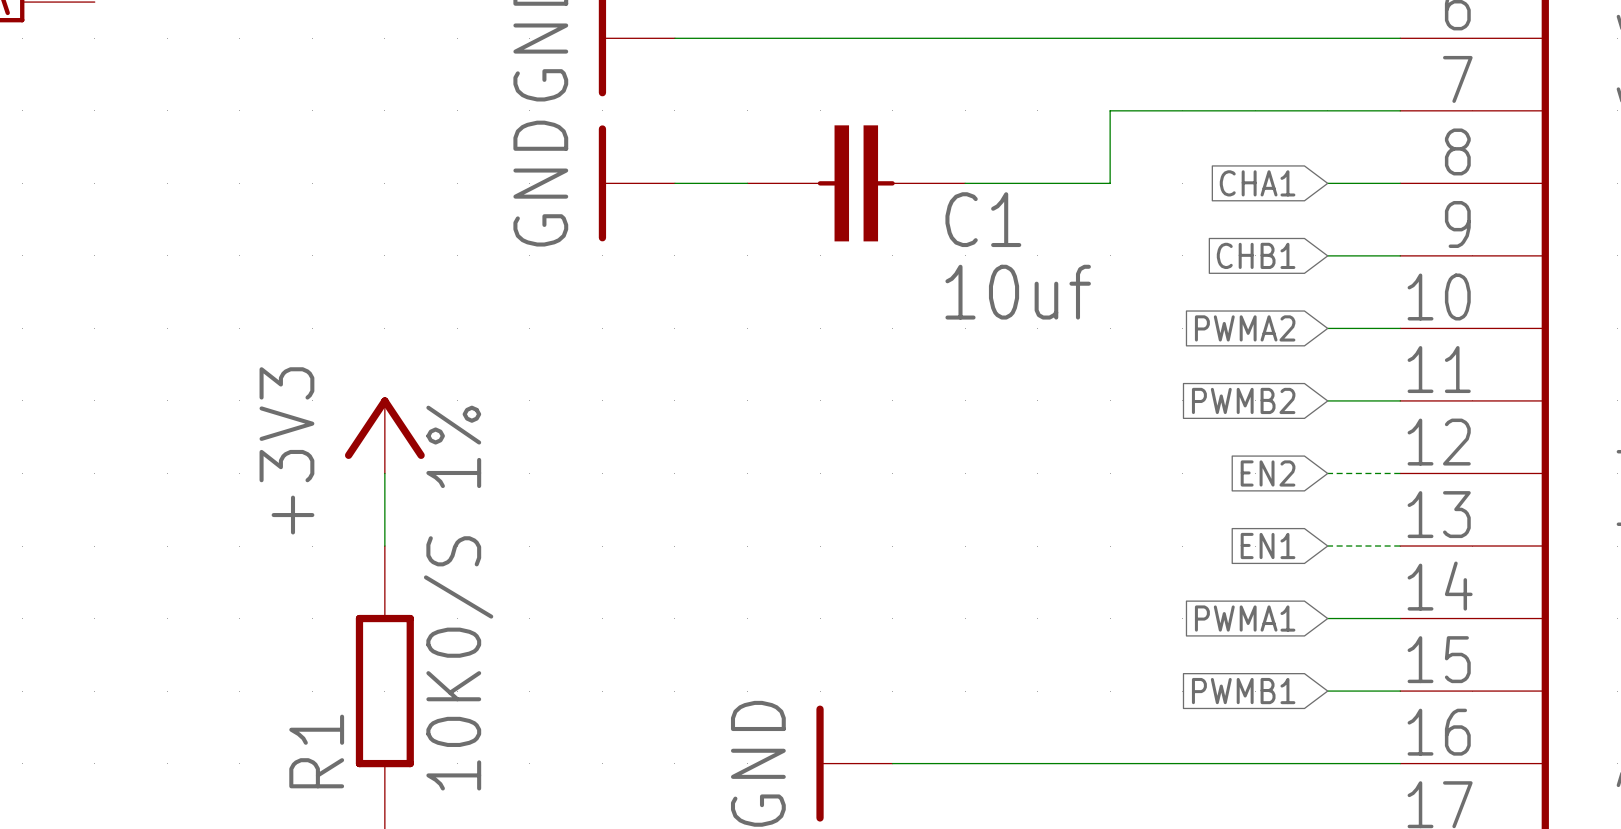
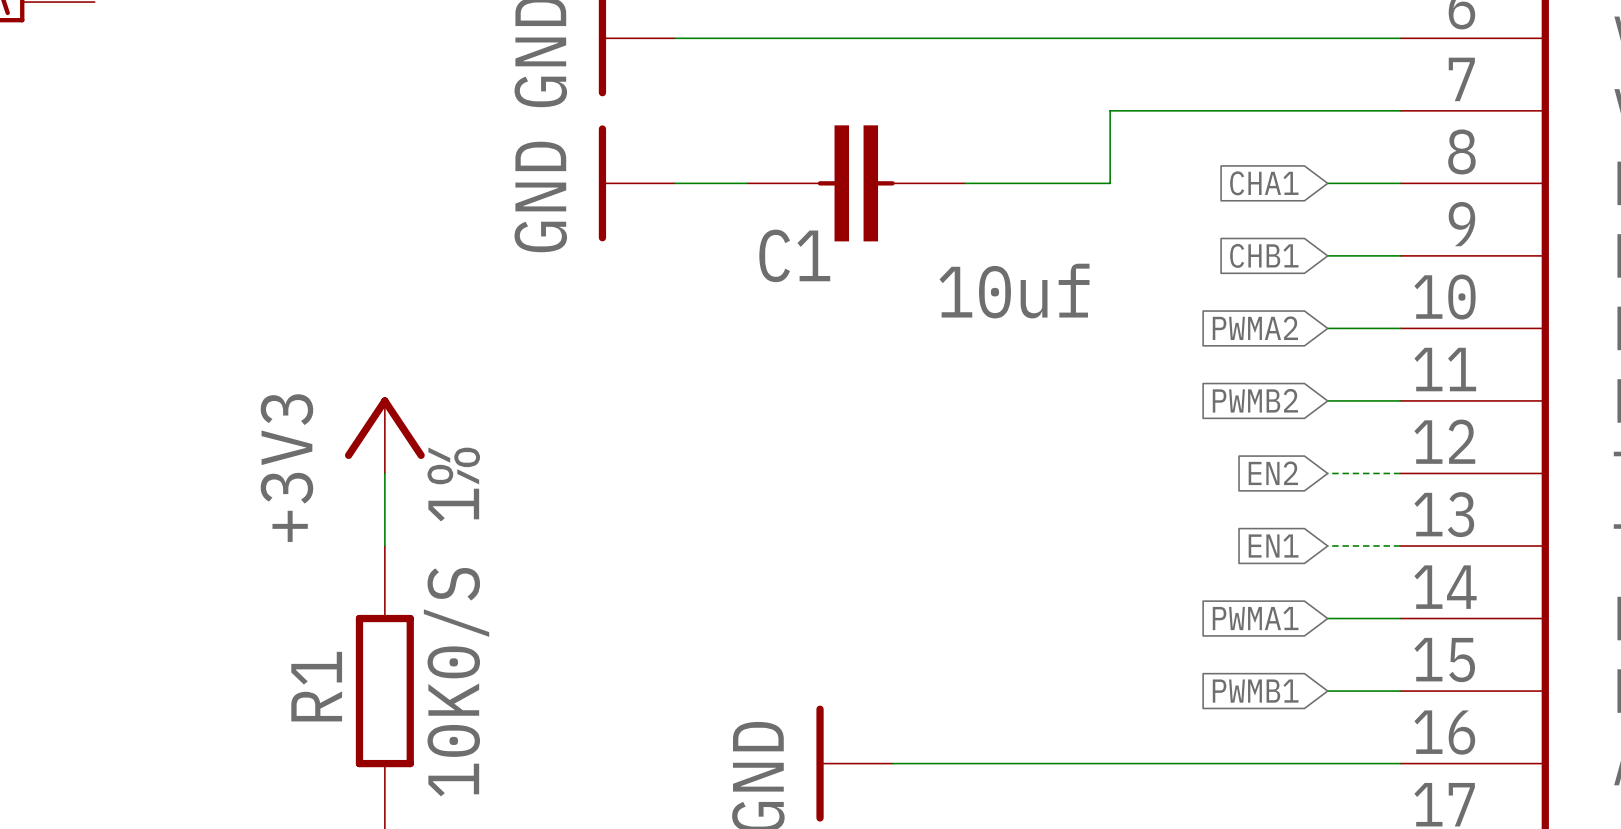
C1 name position: C1 (983, 219) -> C1 (794, 255)
R1 name position: R1 (316, 751) -> R1 (316, 686)

